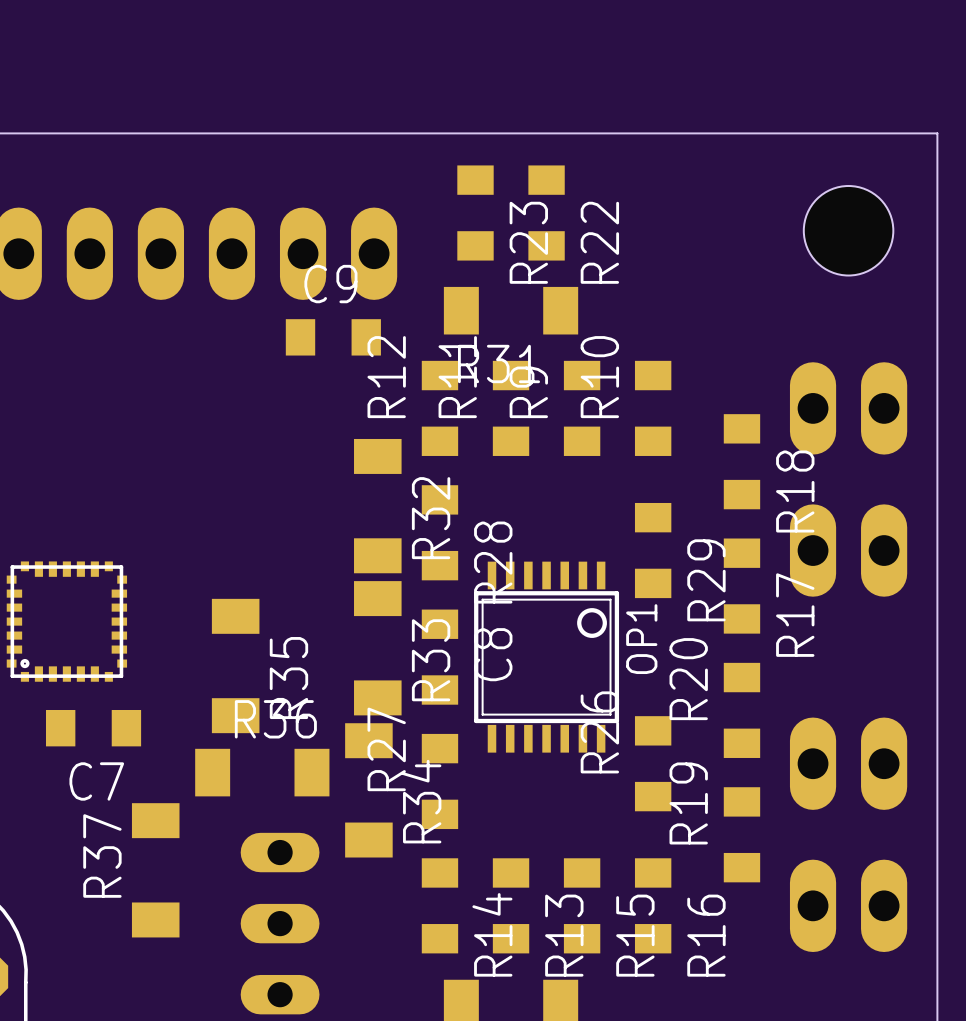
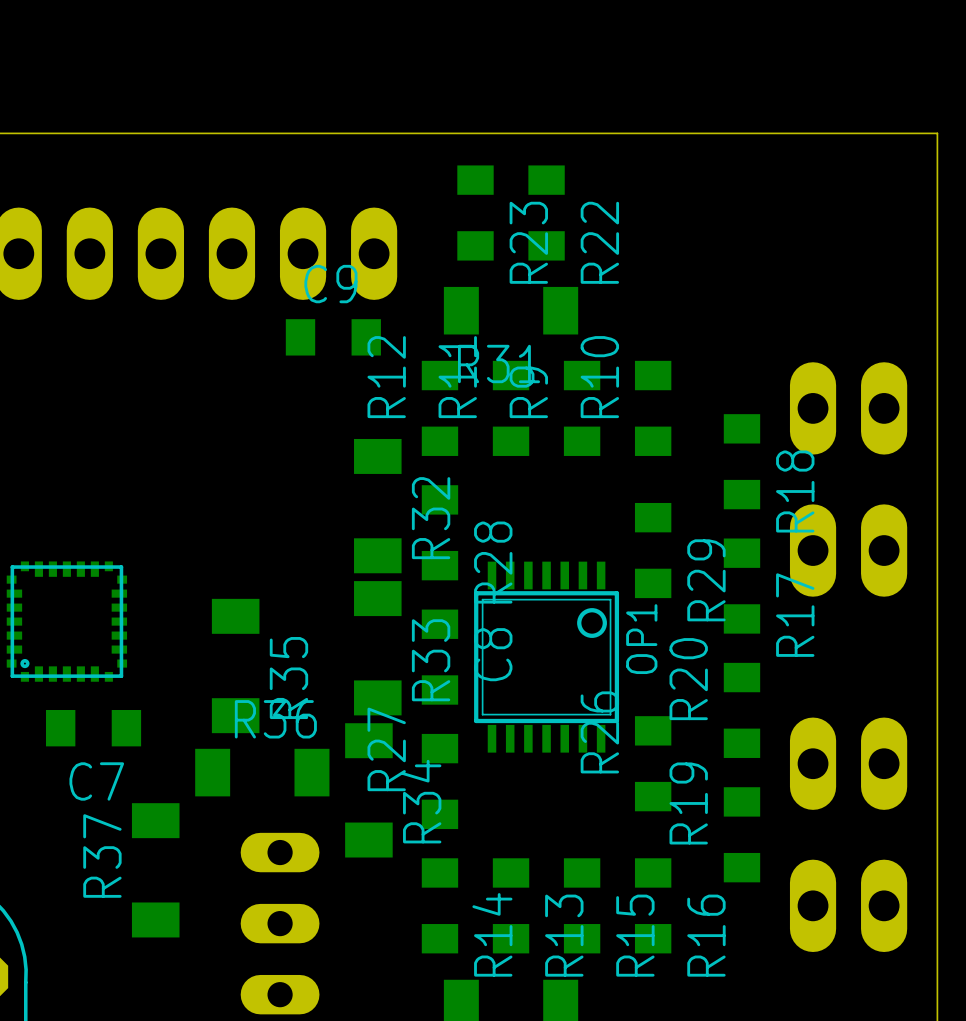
hole: (848, 230) -> none

